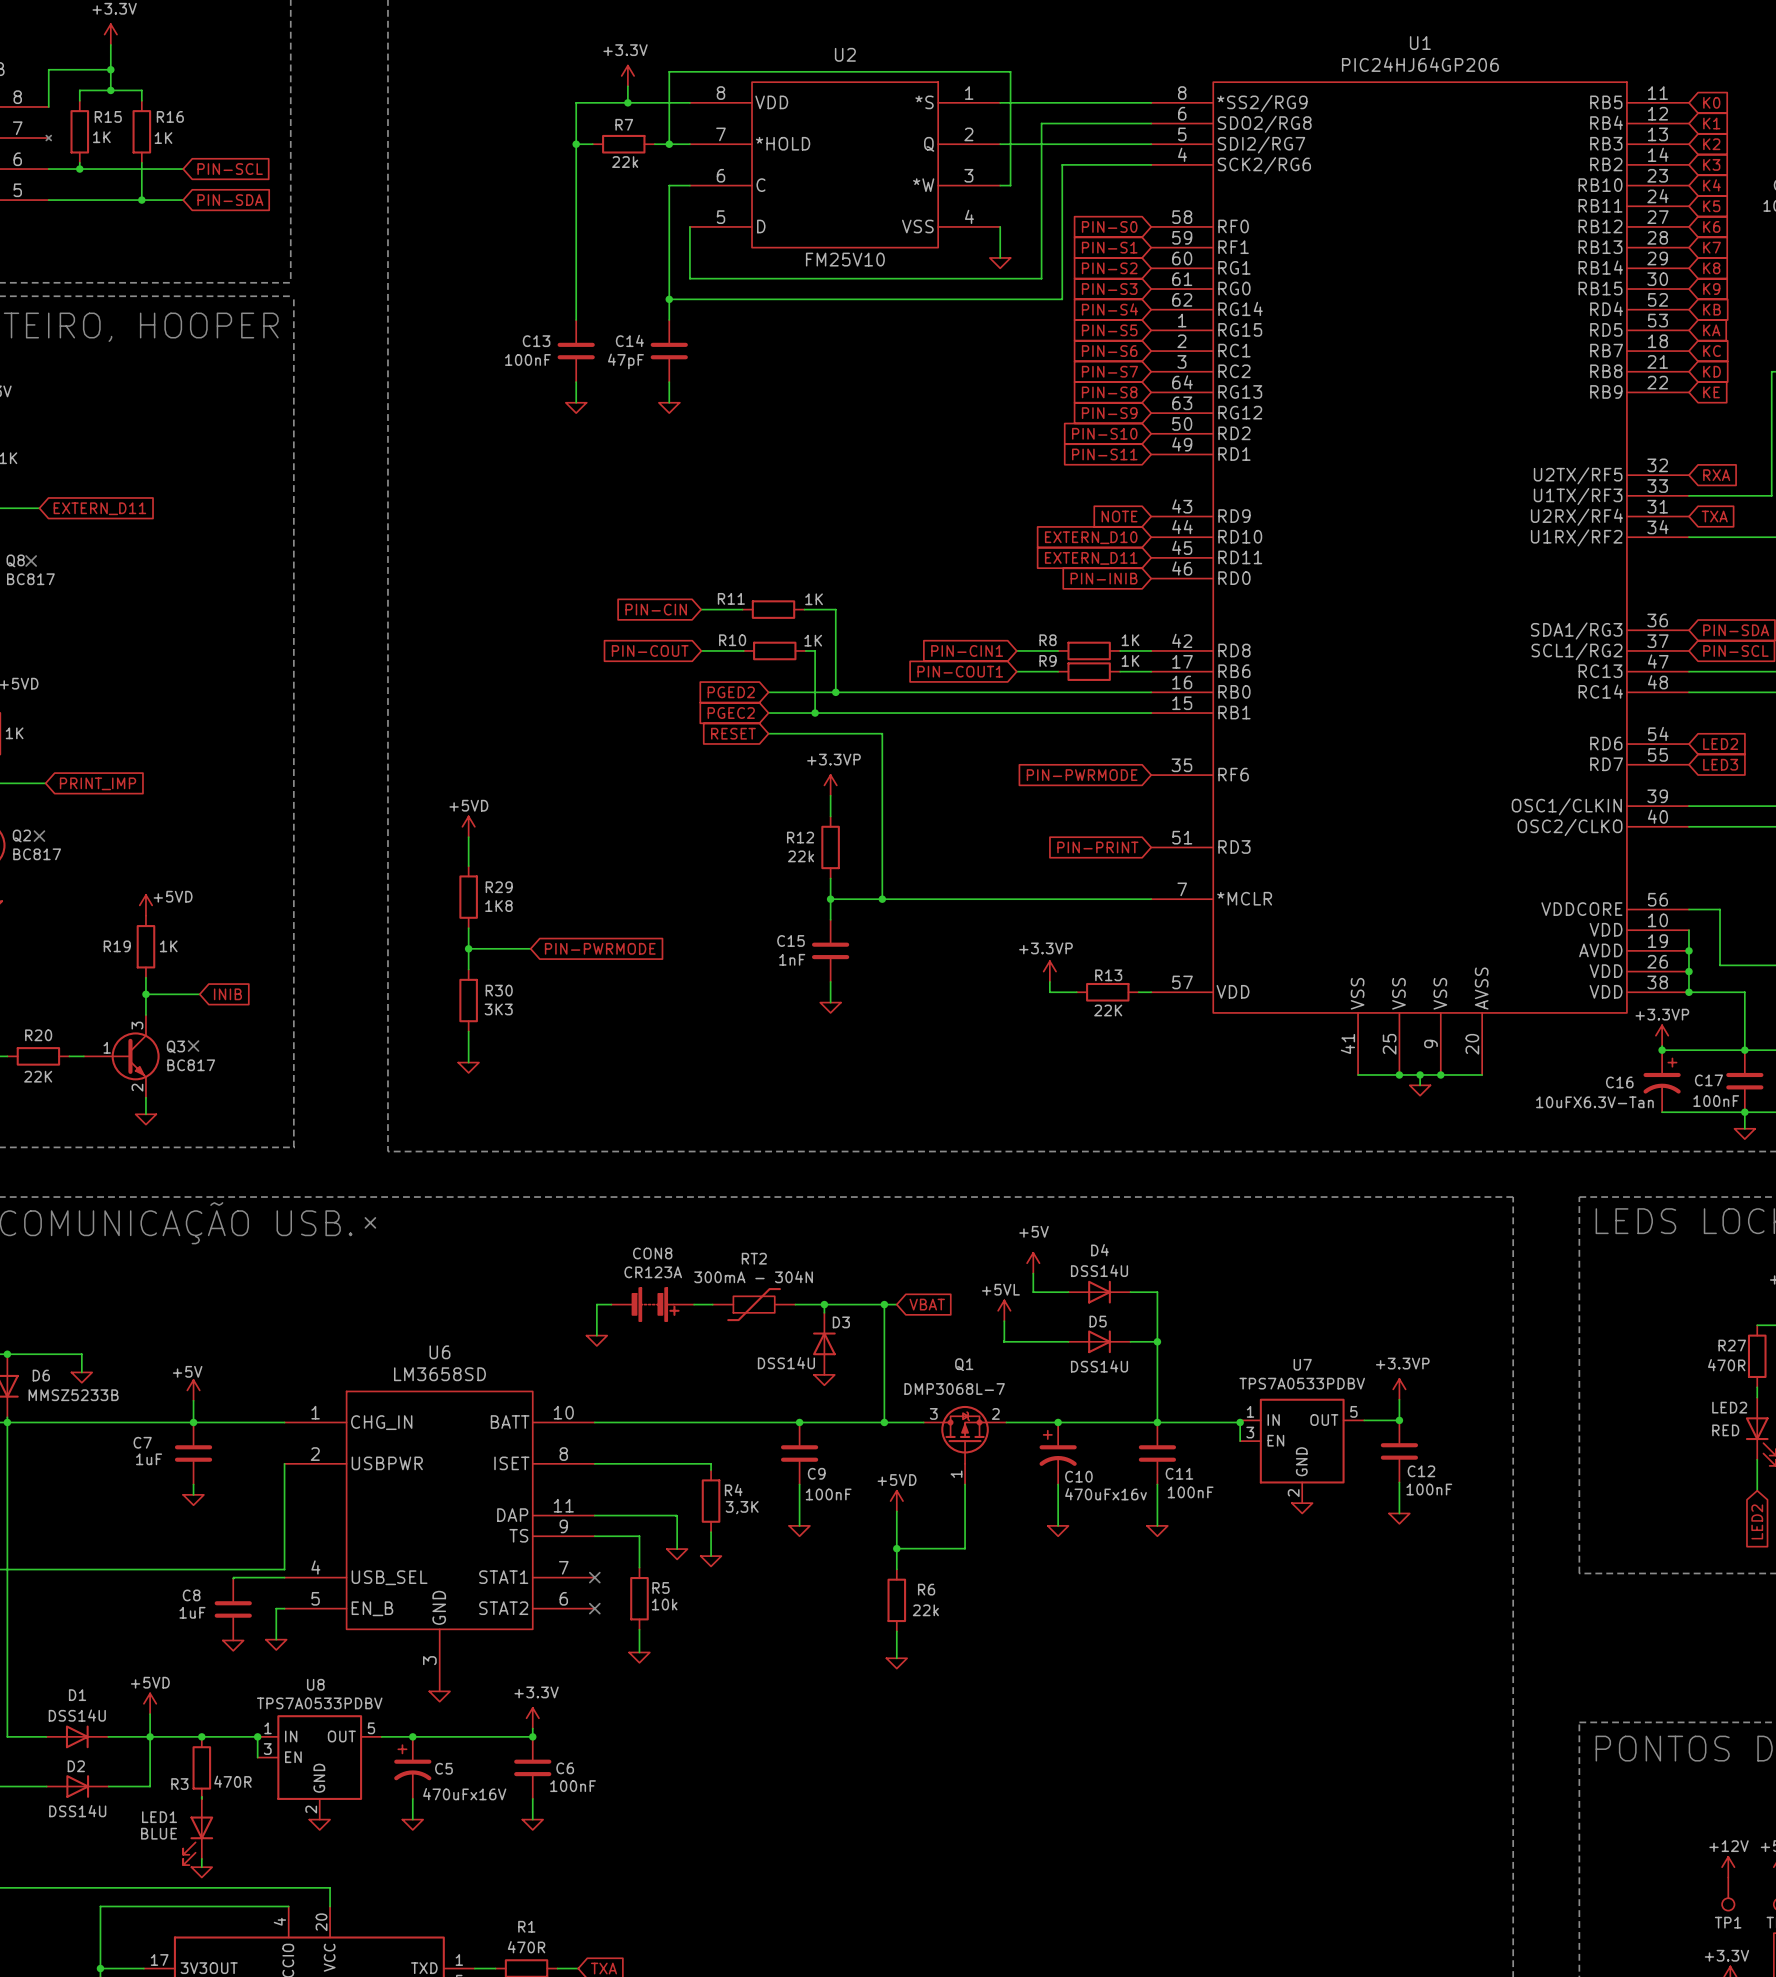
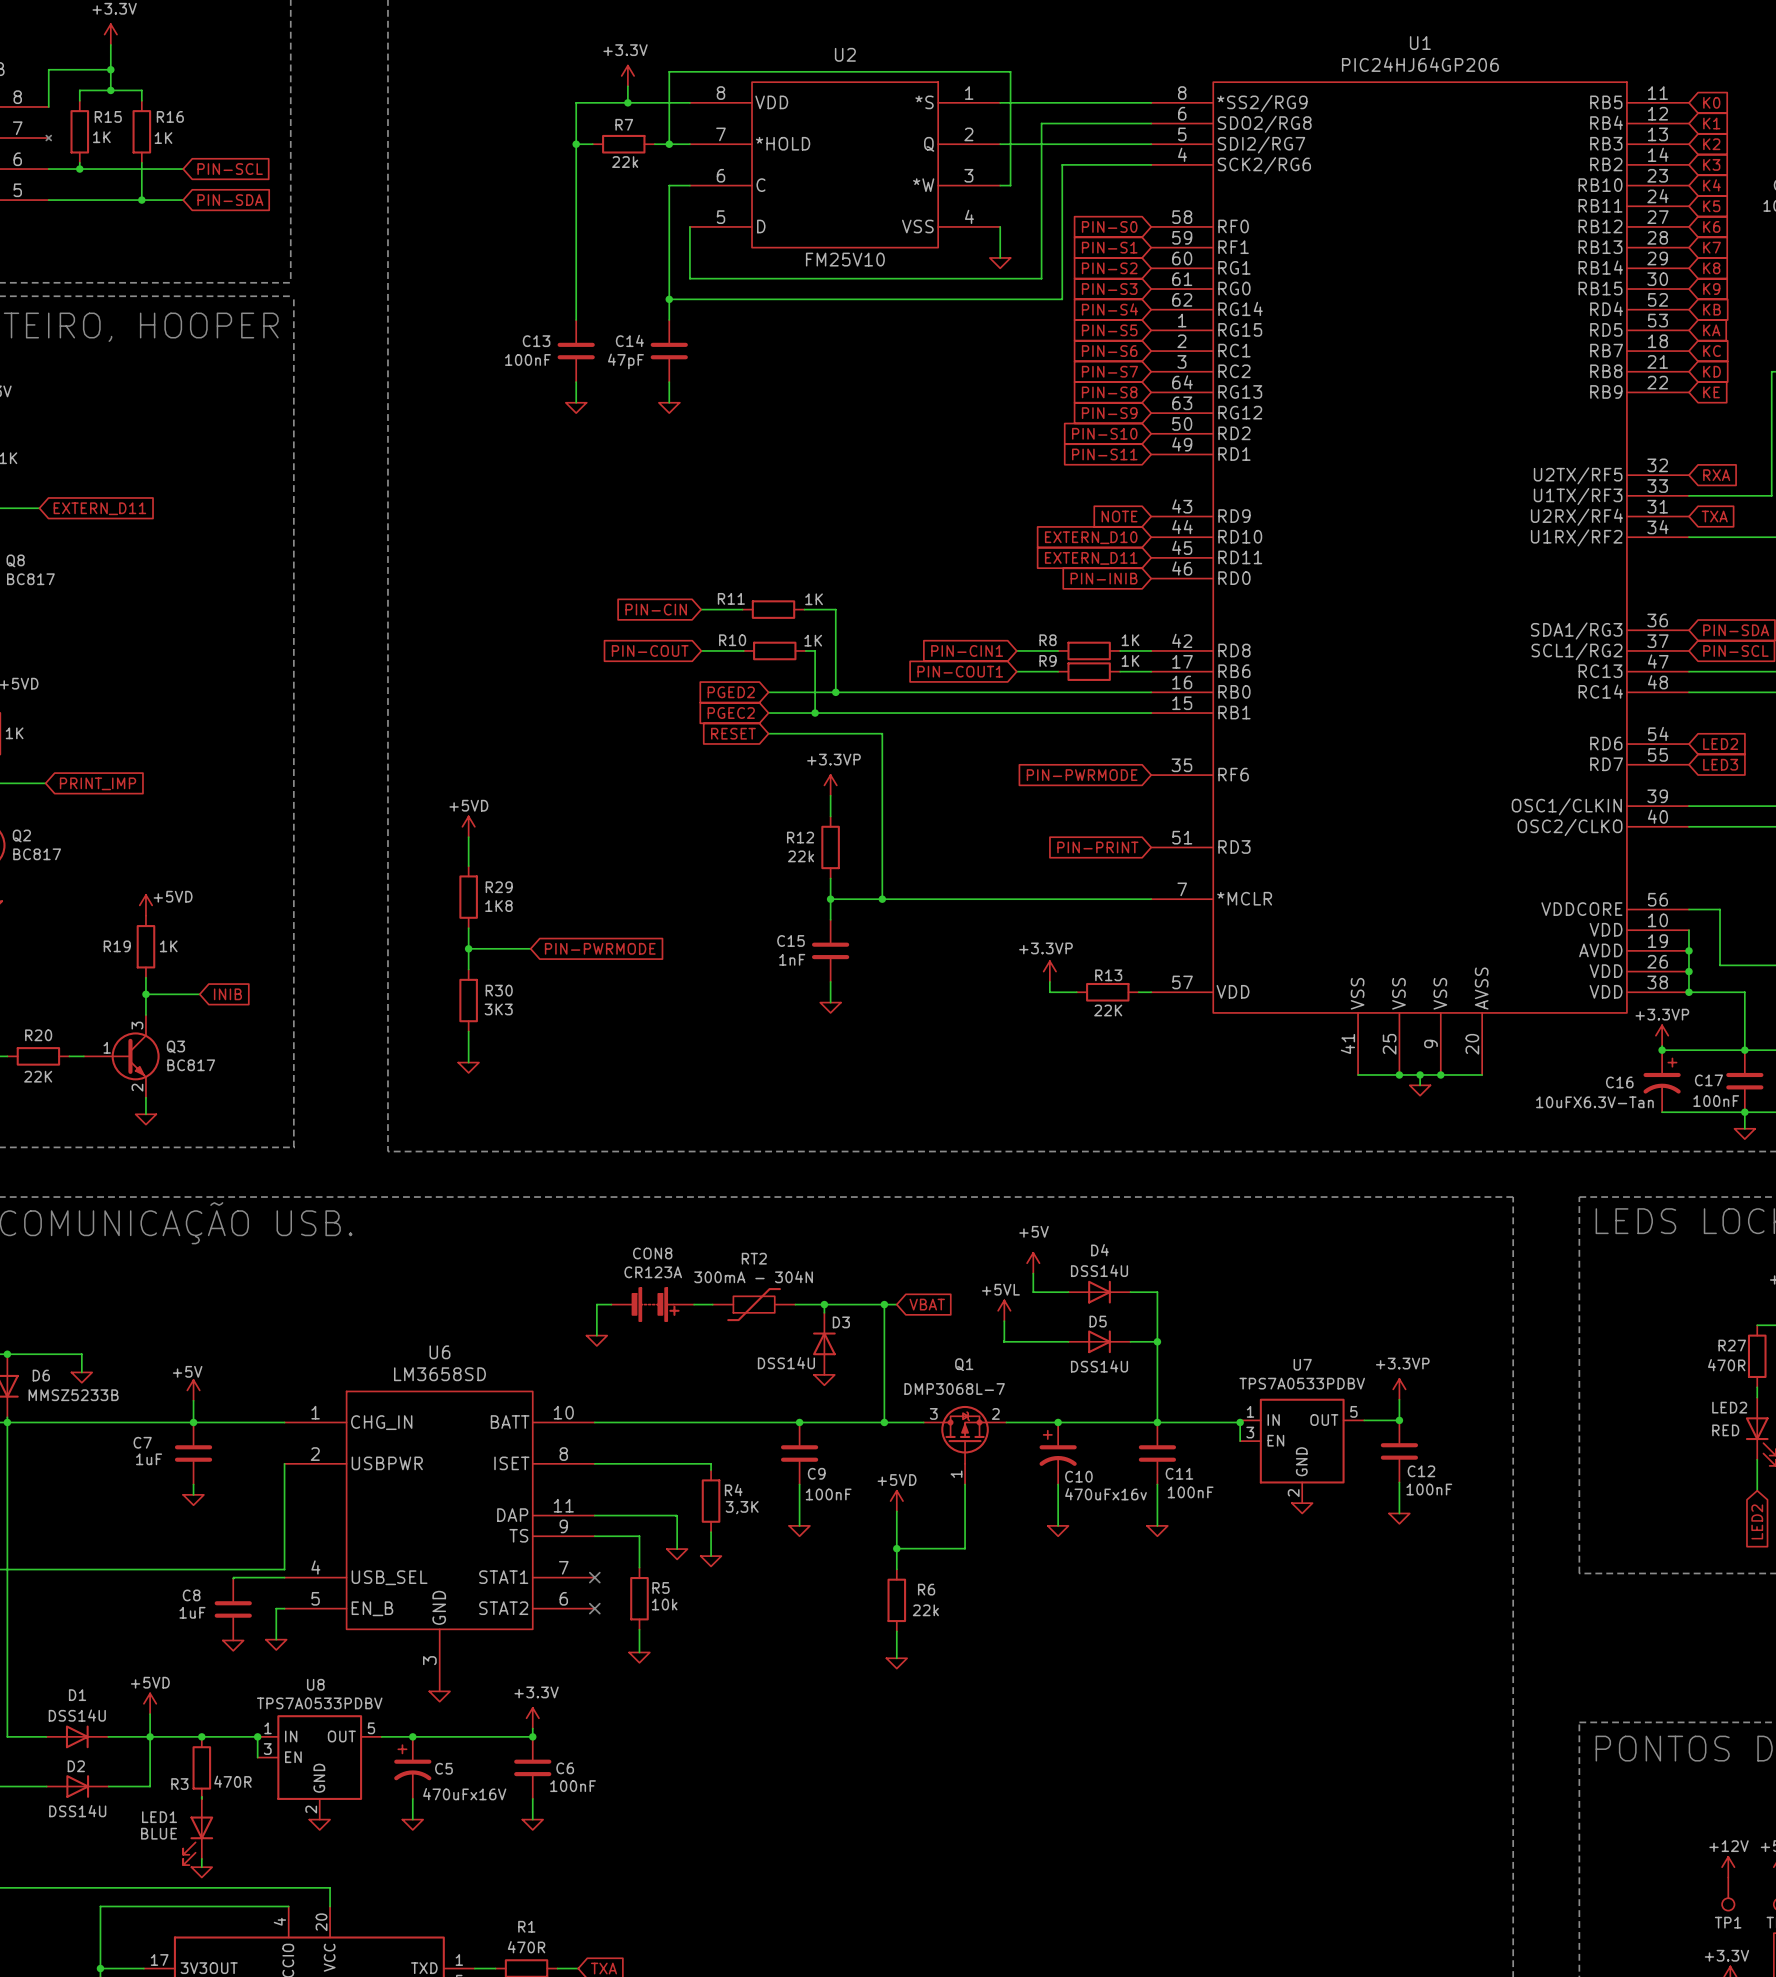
no-connect mark: (31, 561) -> none
no-connect mark: (39, 836) -> none
no-connect mark: (193, 1046) -> none
no-connect mark: (370, 1222) -> none

